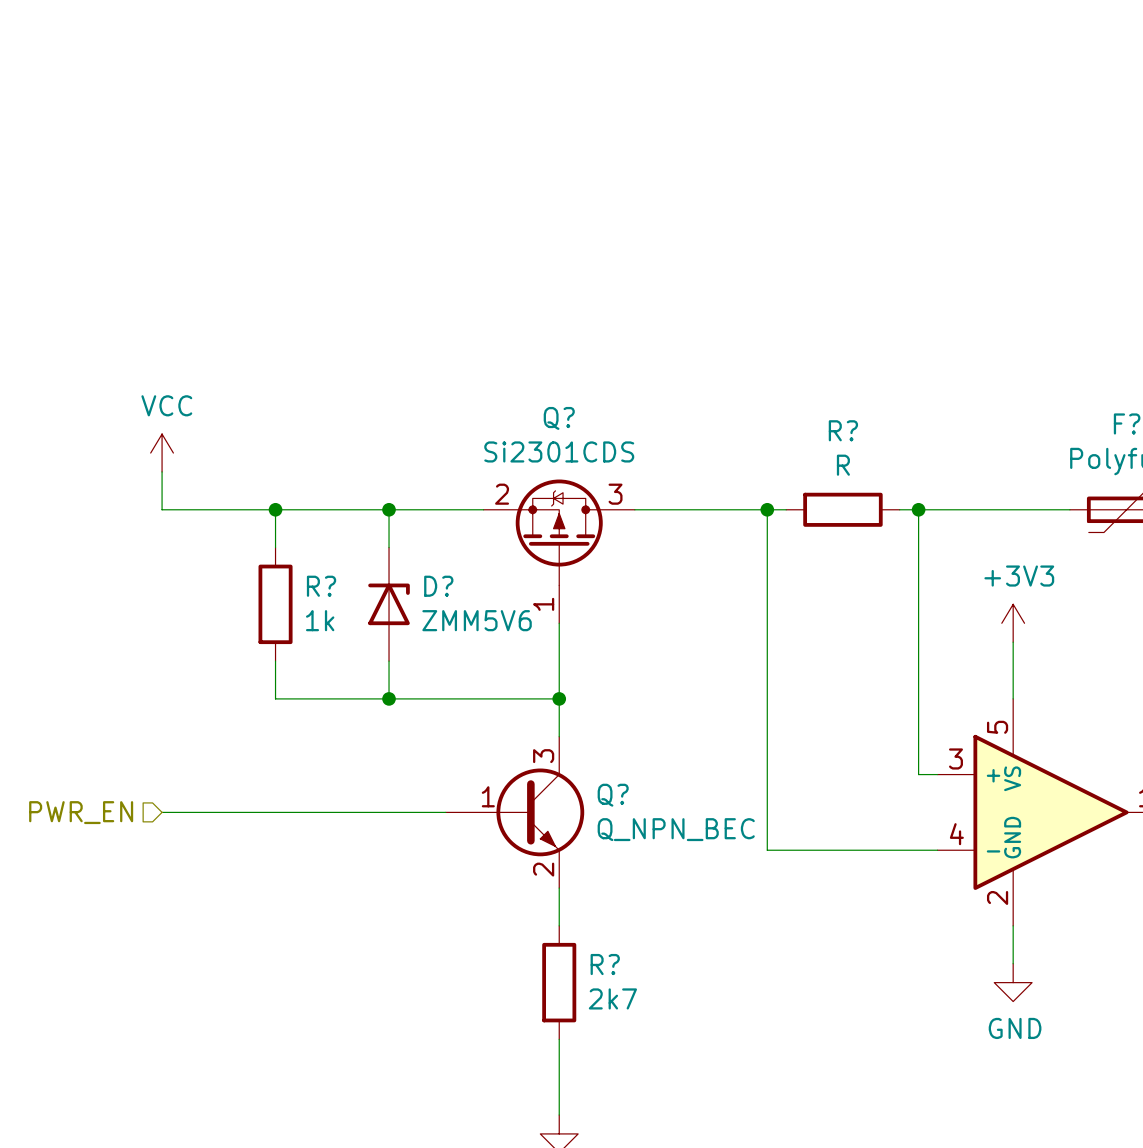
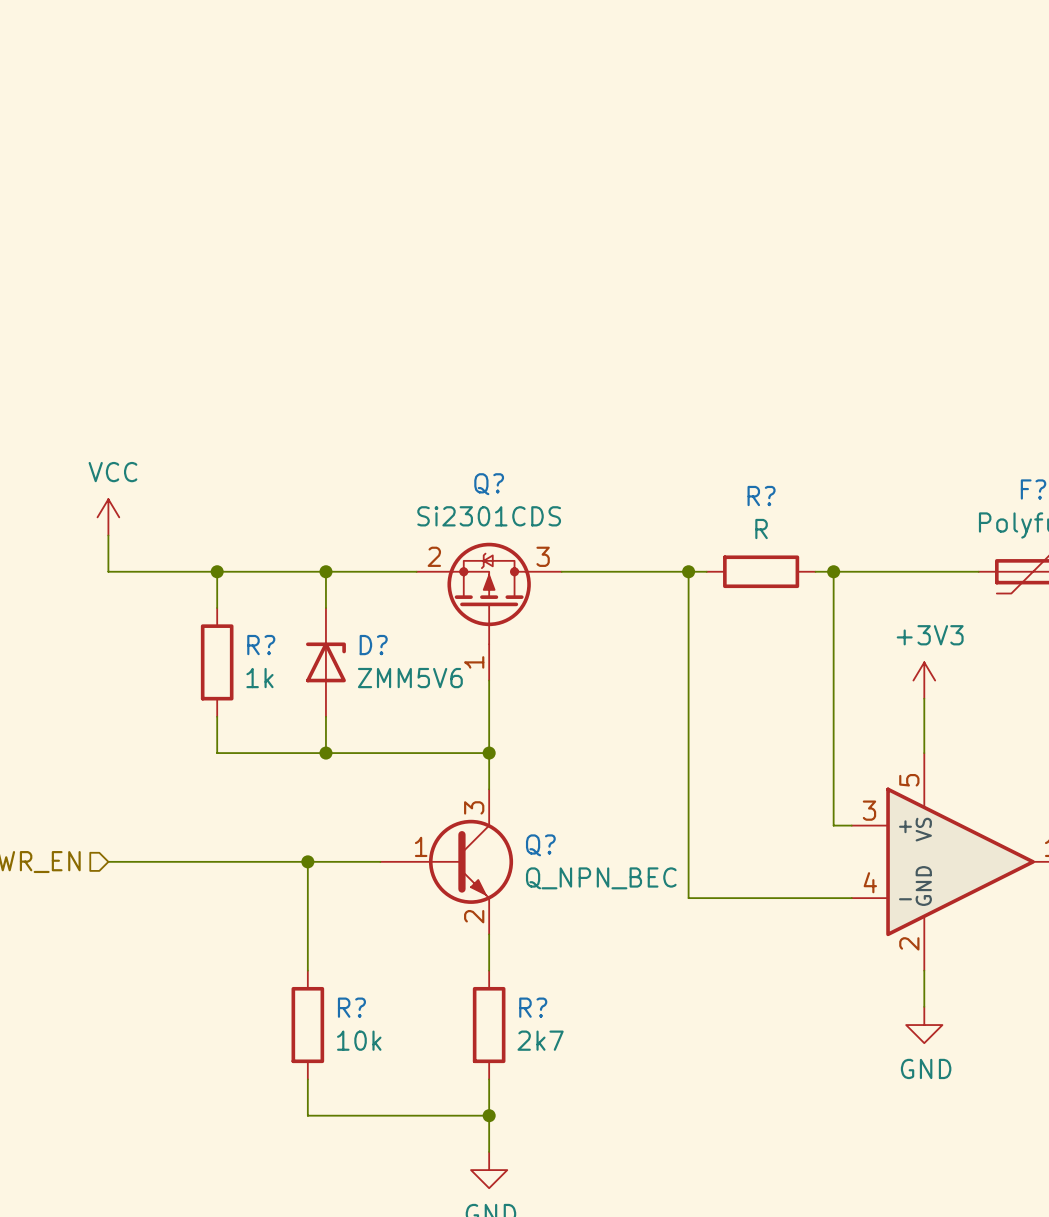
wire: none -> (307, 861) (307, 970)
junction: none -> (307, 861)
R?: none -> 10k (307, 1025)
wire: none -> (307, 1079) (307, 1115) (489, 1115)
junction: none -> (489, 1115)

